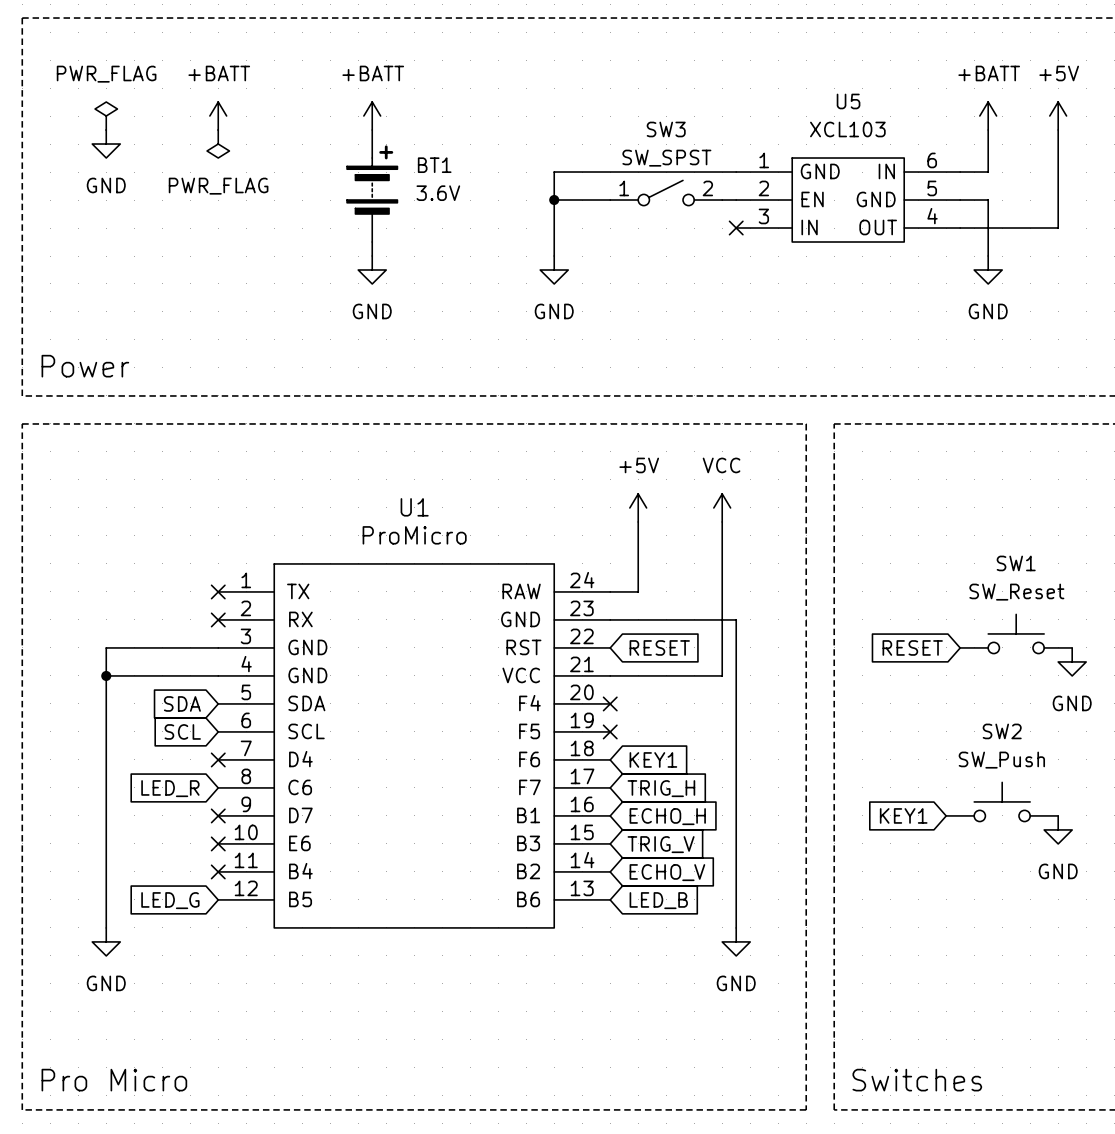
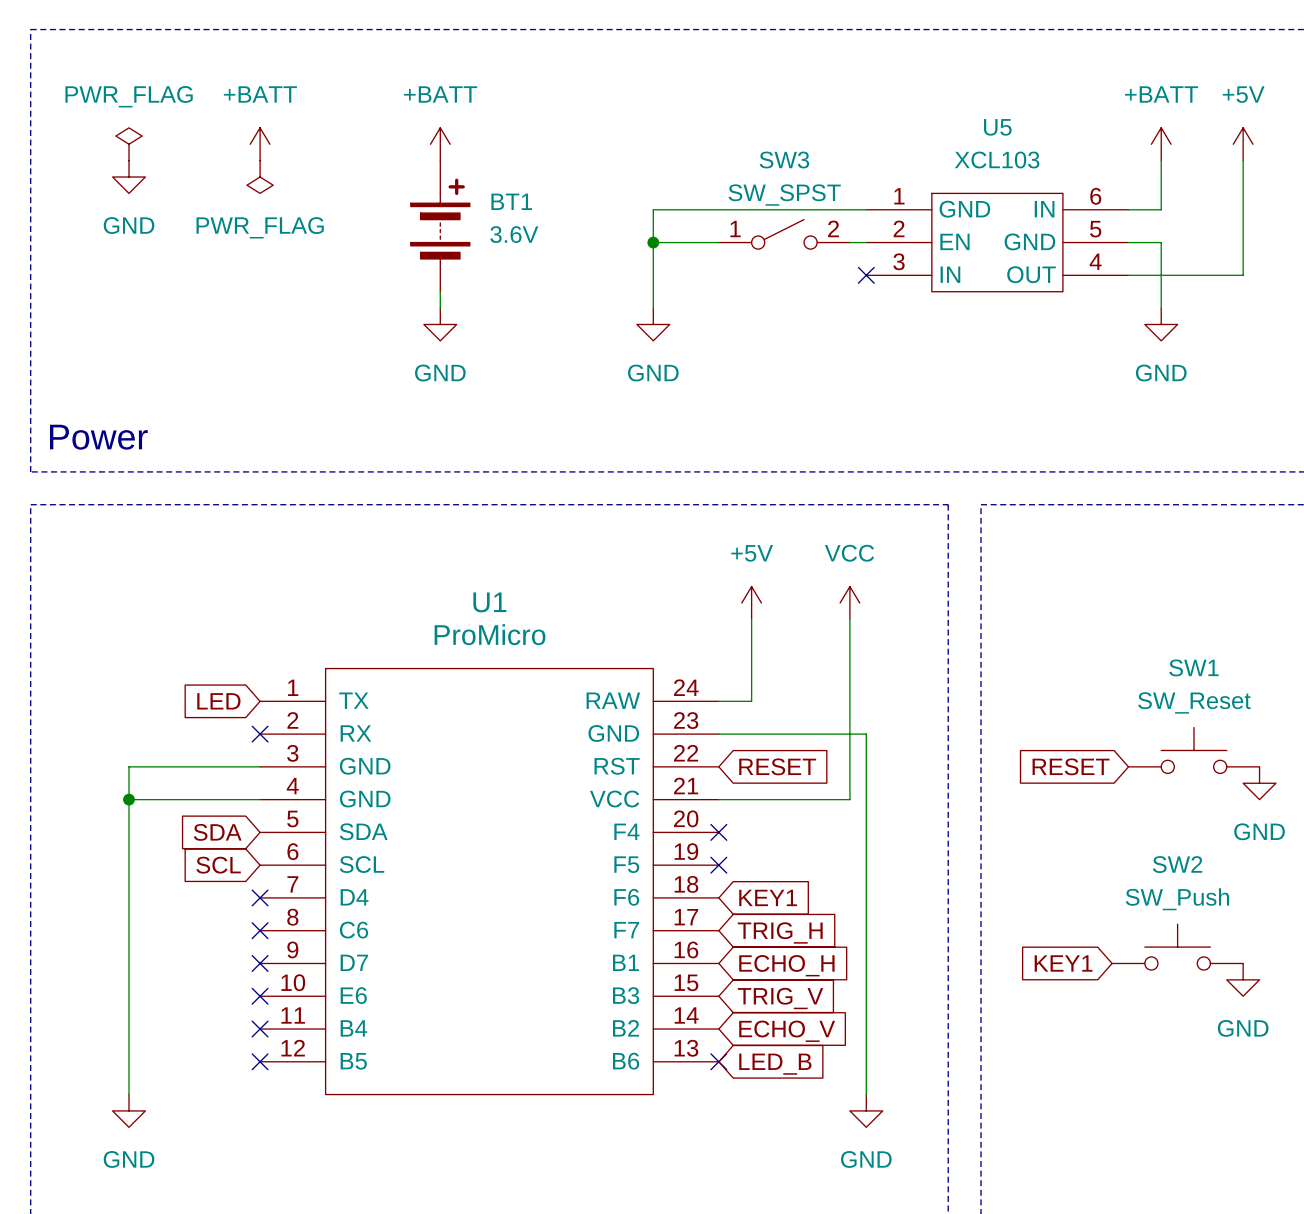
global label: none -> LED (218, 701)
no-connect mark: (218, 591) -> none
no-connect mark: none -> (260, 930)
global label: LED_R (170, 788) -> none
no-connect mark: none -> (260, 1061)
no-connect mark: none -> (718, 1061)
global label: LED_G (170, 900) -> none

